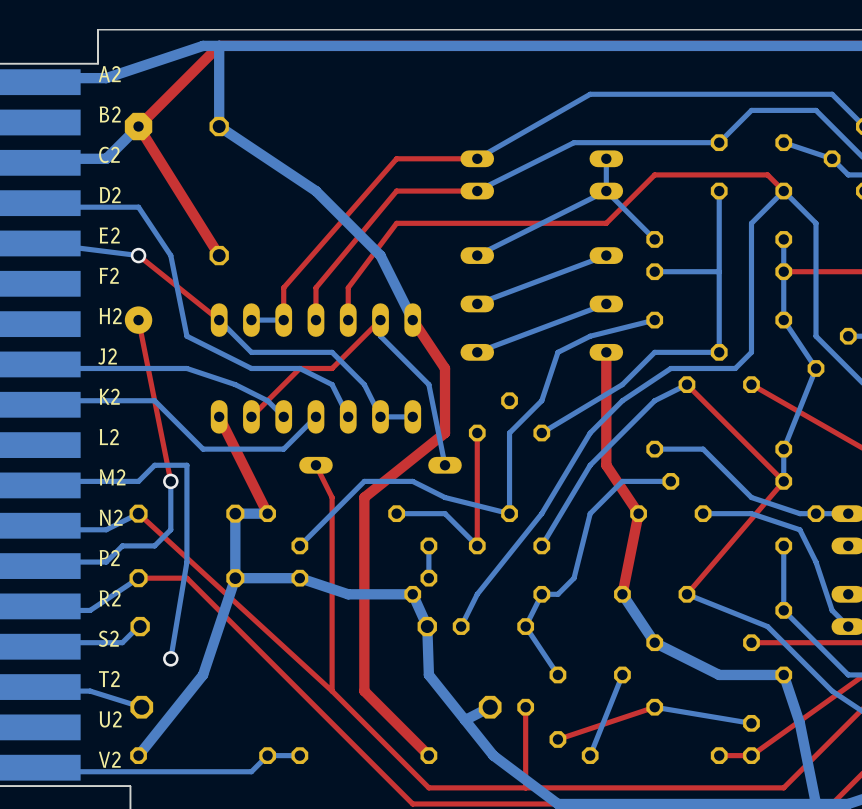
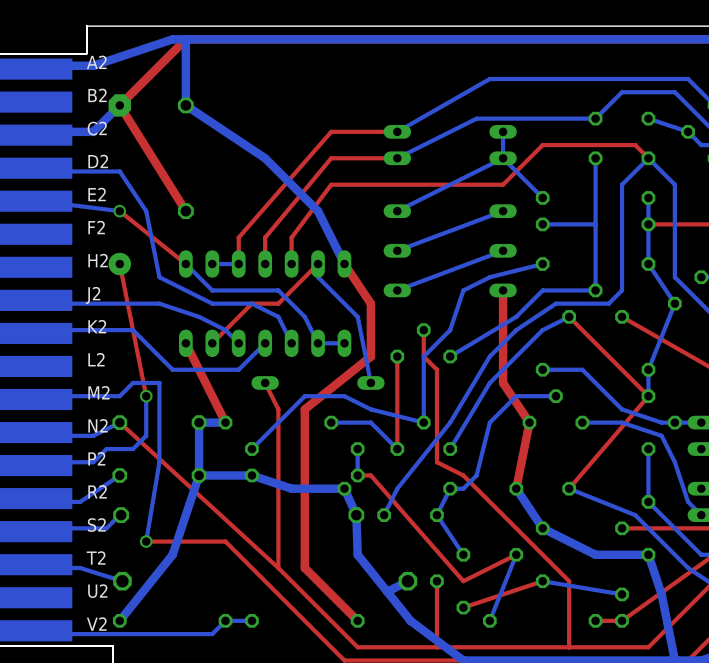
top track: none -> (423, 330) (423, 356) (436, 369) (436, 462) (463, 475) (569, 581) (569, 647)
top track: (138, 578) (186, 578) (267, 658) -> (146, 541) (225, 541)
top track: none -> (357, 475) (370, 475) (463, 581) (516, 554)

